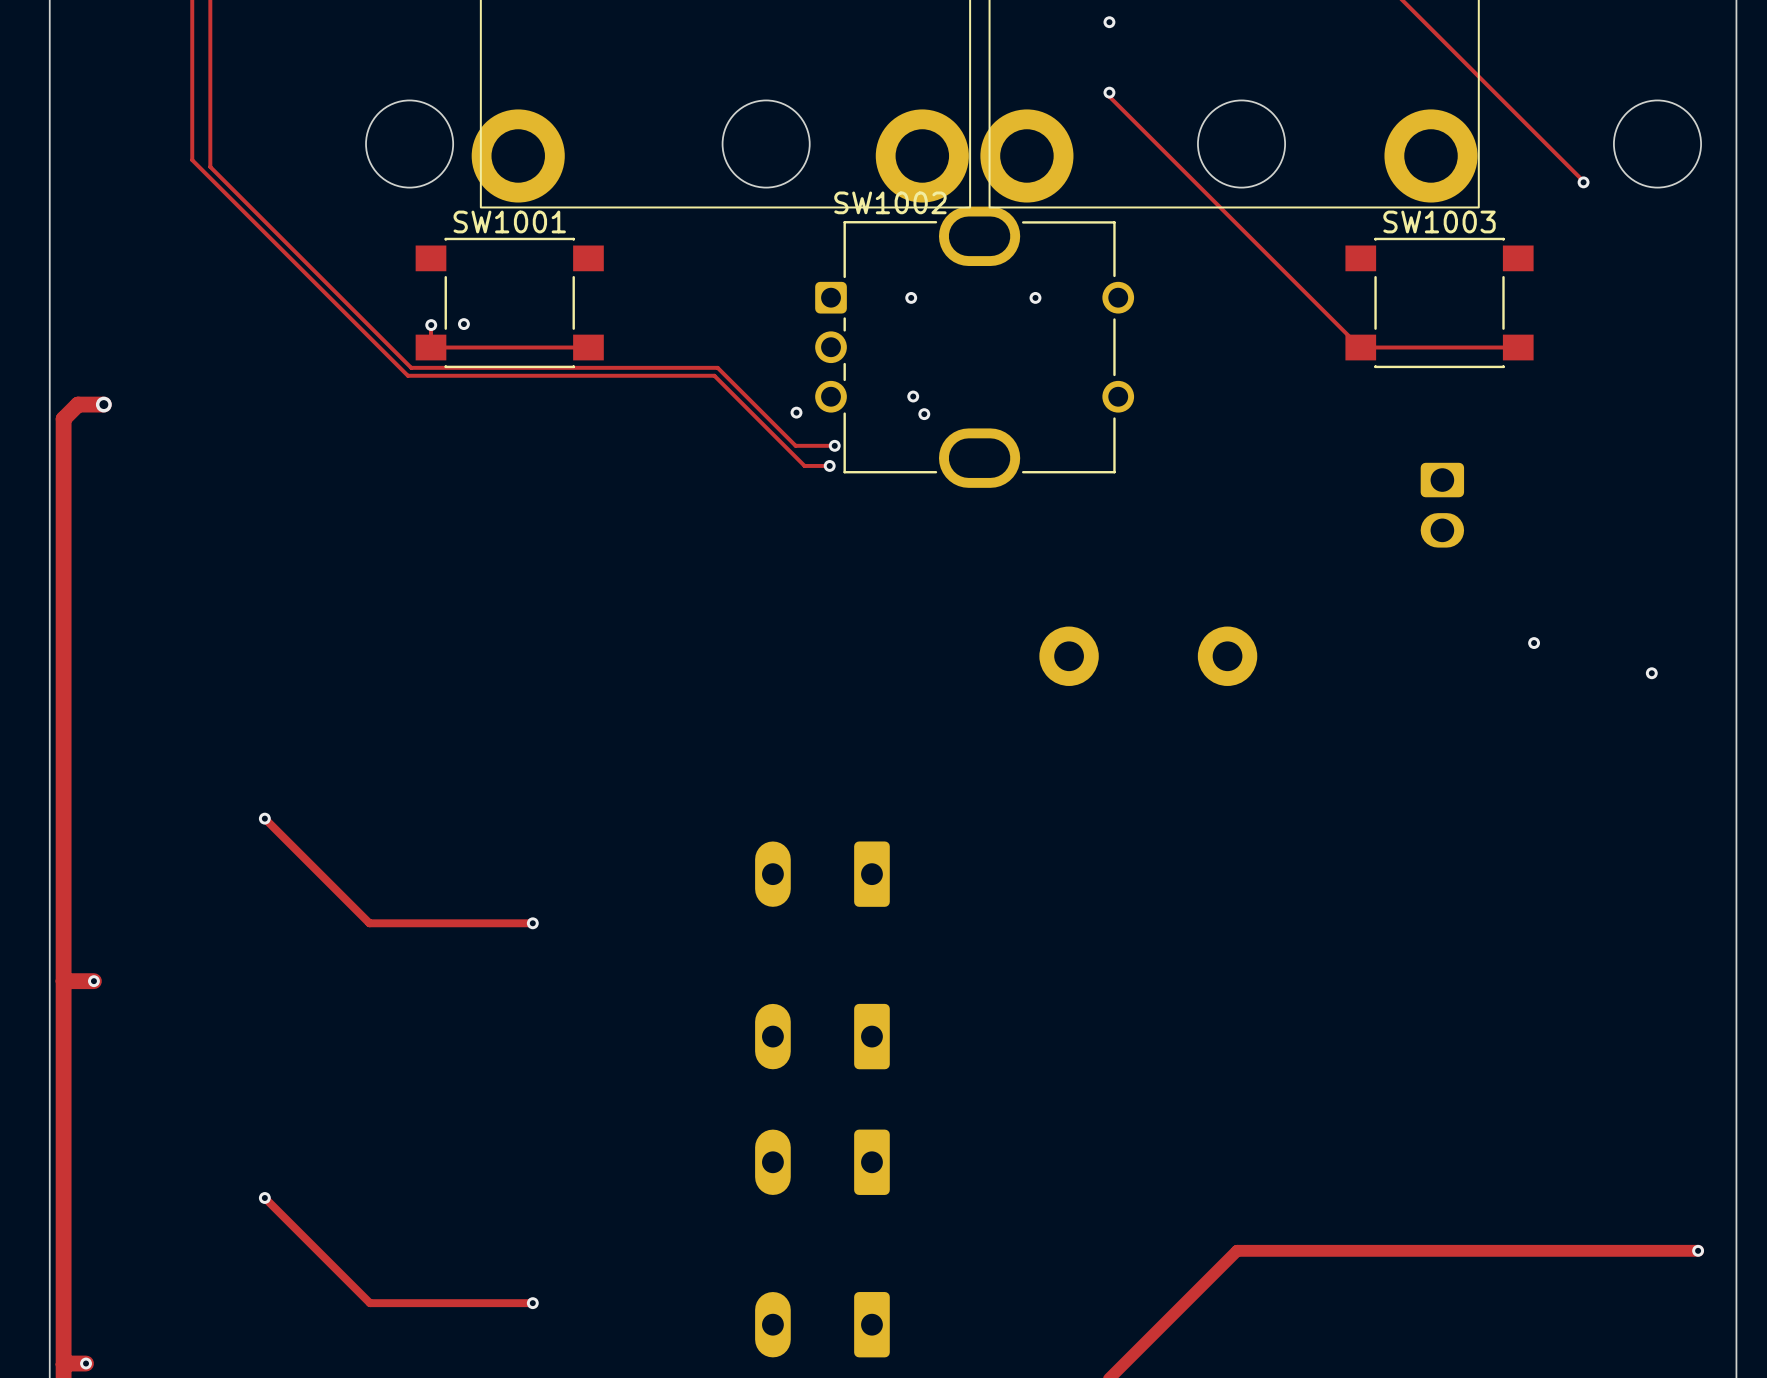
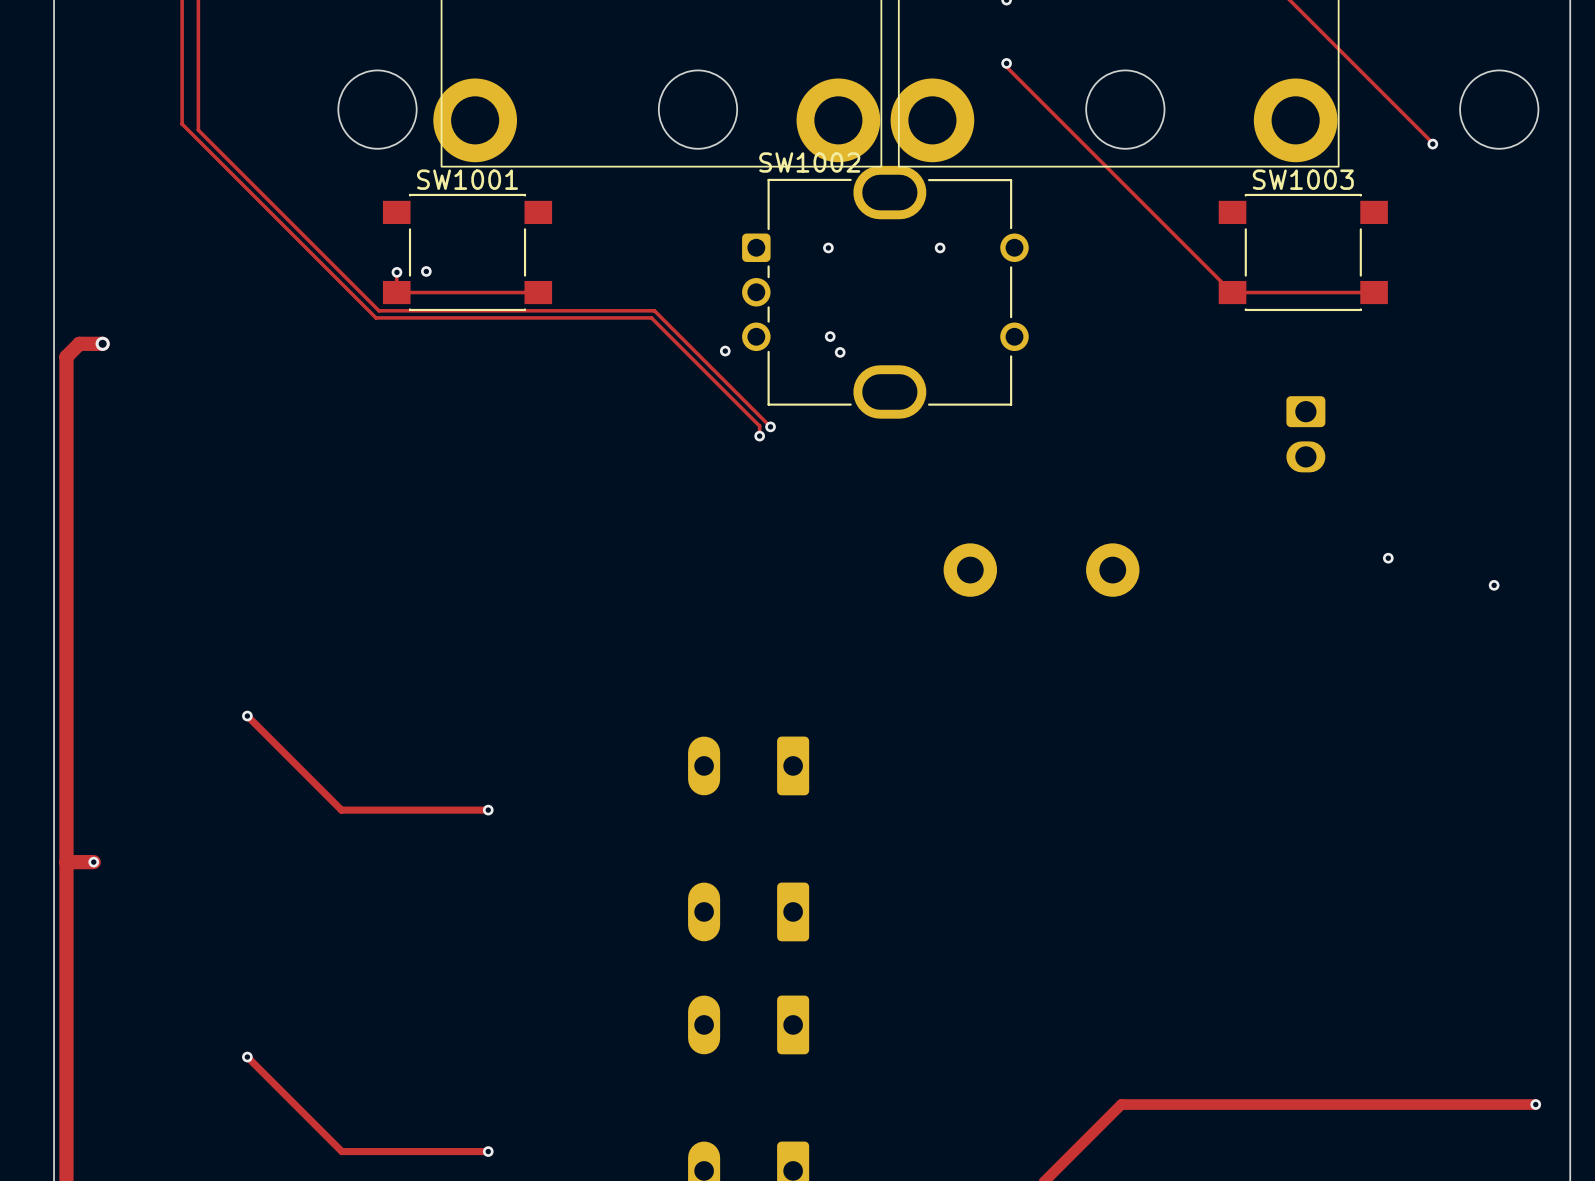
track: (795, 445) (834, 445) -> (724, 380) (770, 426)
via: (834, 445) -> none
track: (804, 465) (829, 465) -> (732, 399) (759, 426) (759, 436)
via: (829, 465) -> none
via: none -> (770, 426)
via: none -> (759, 436)

